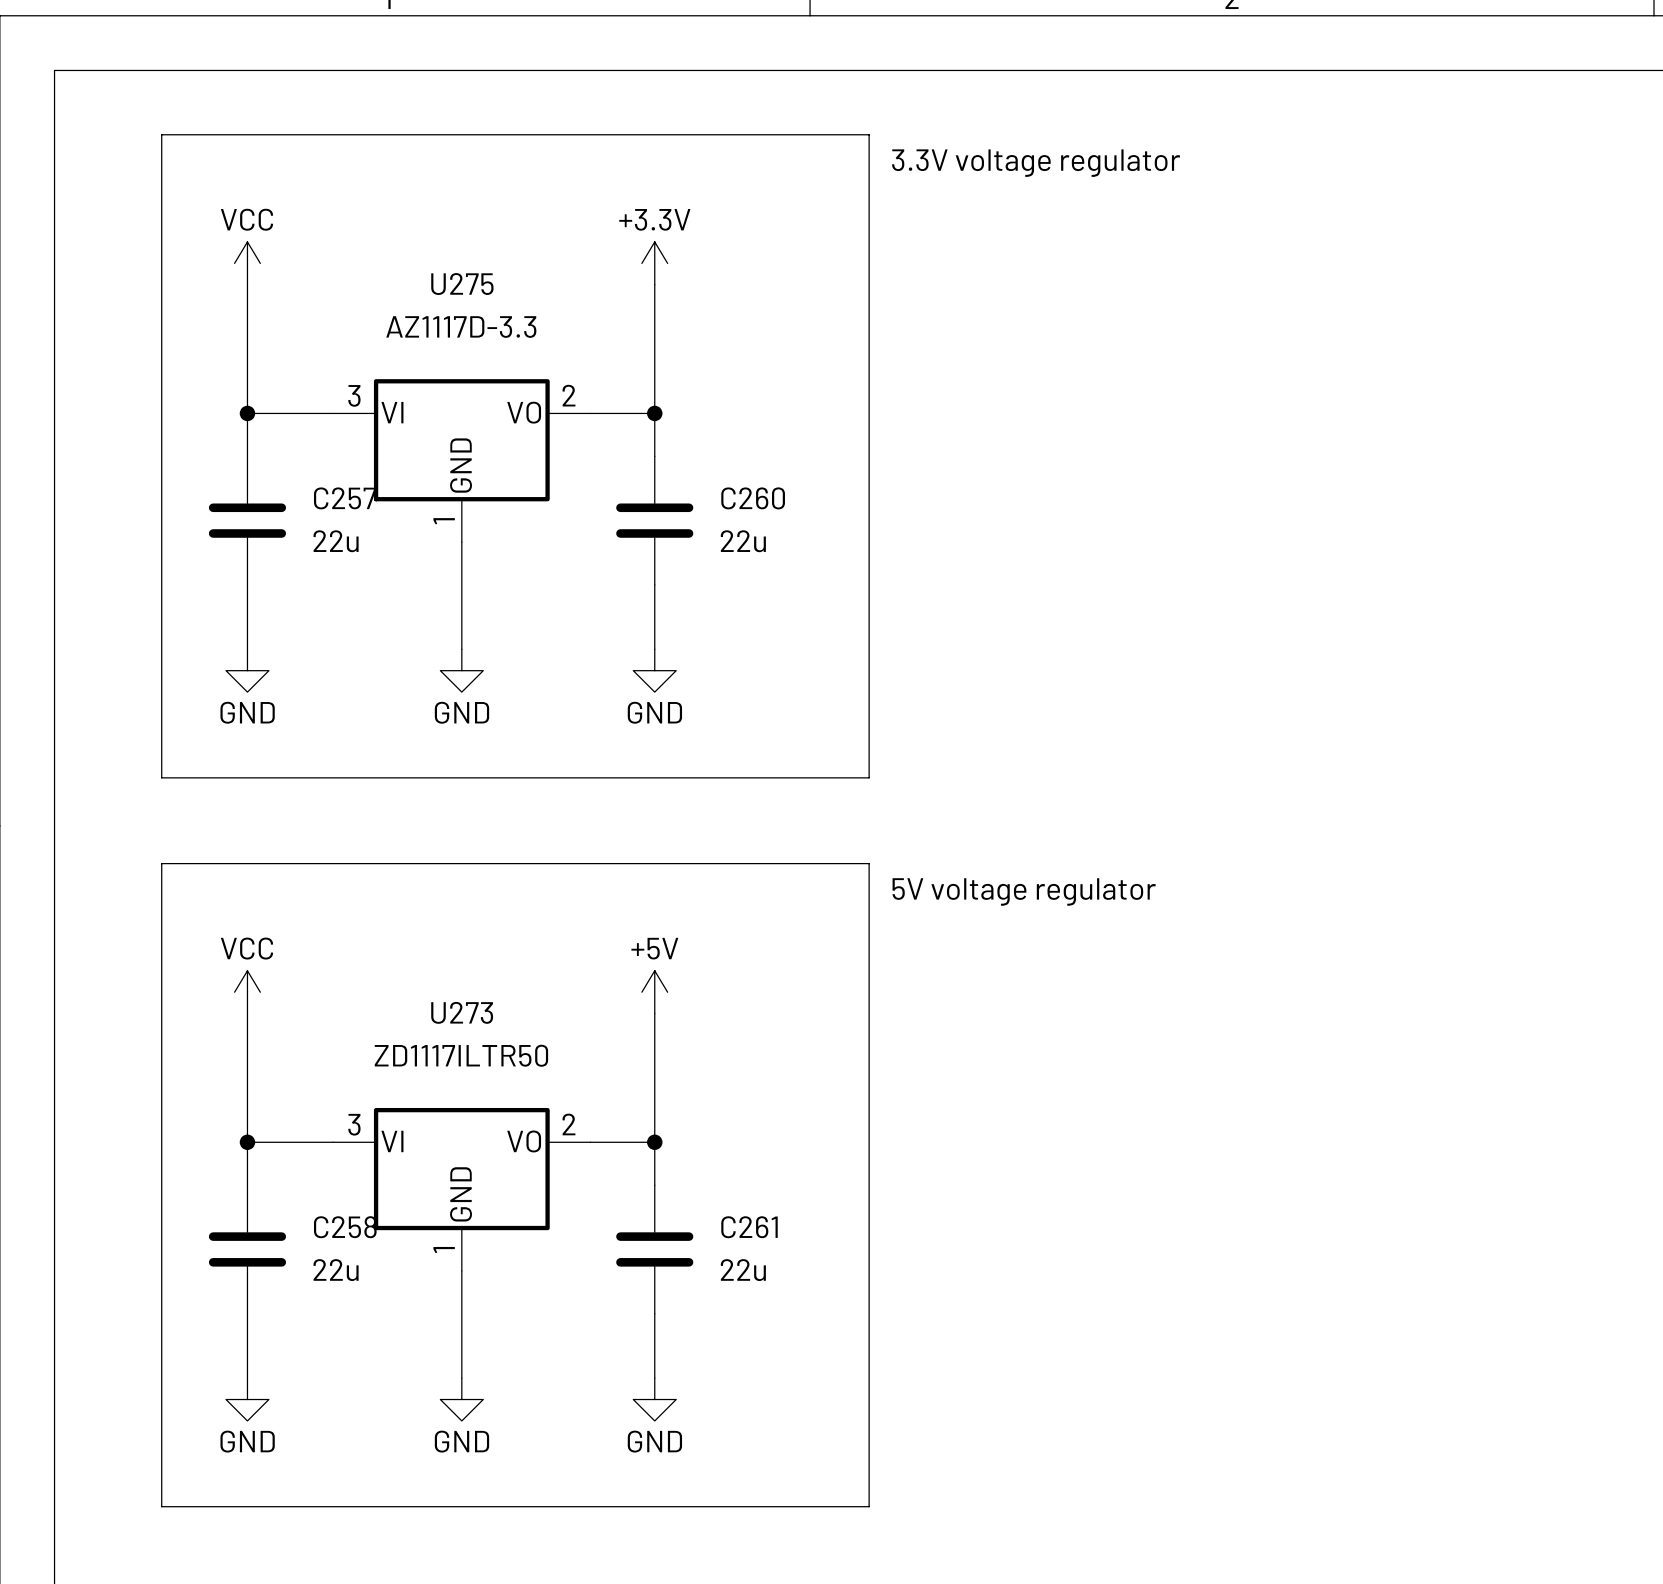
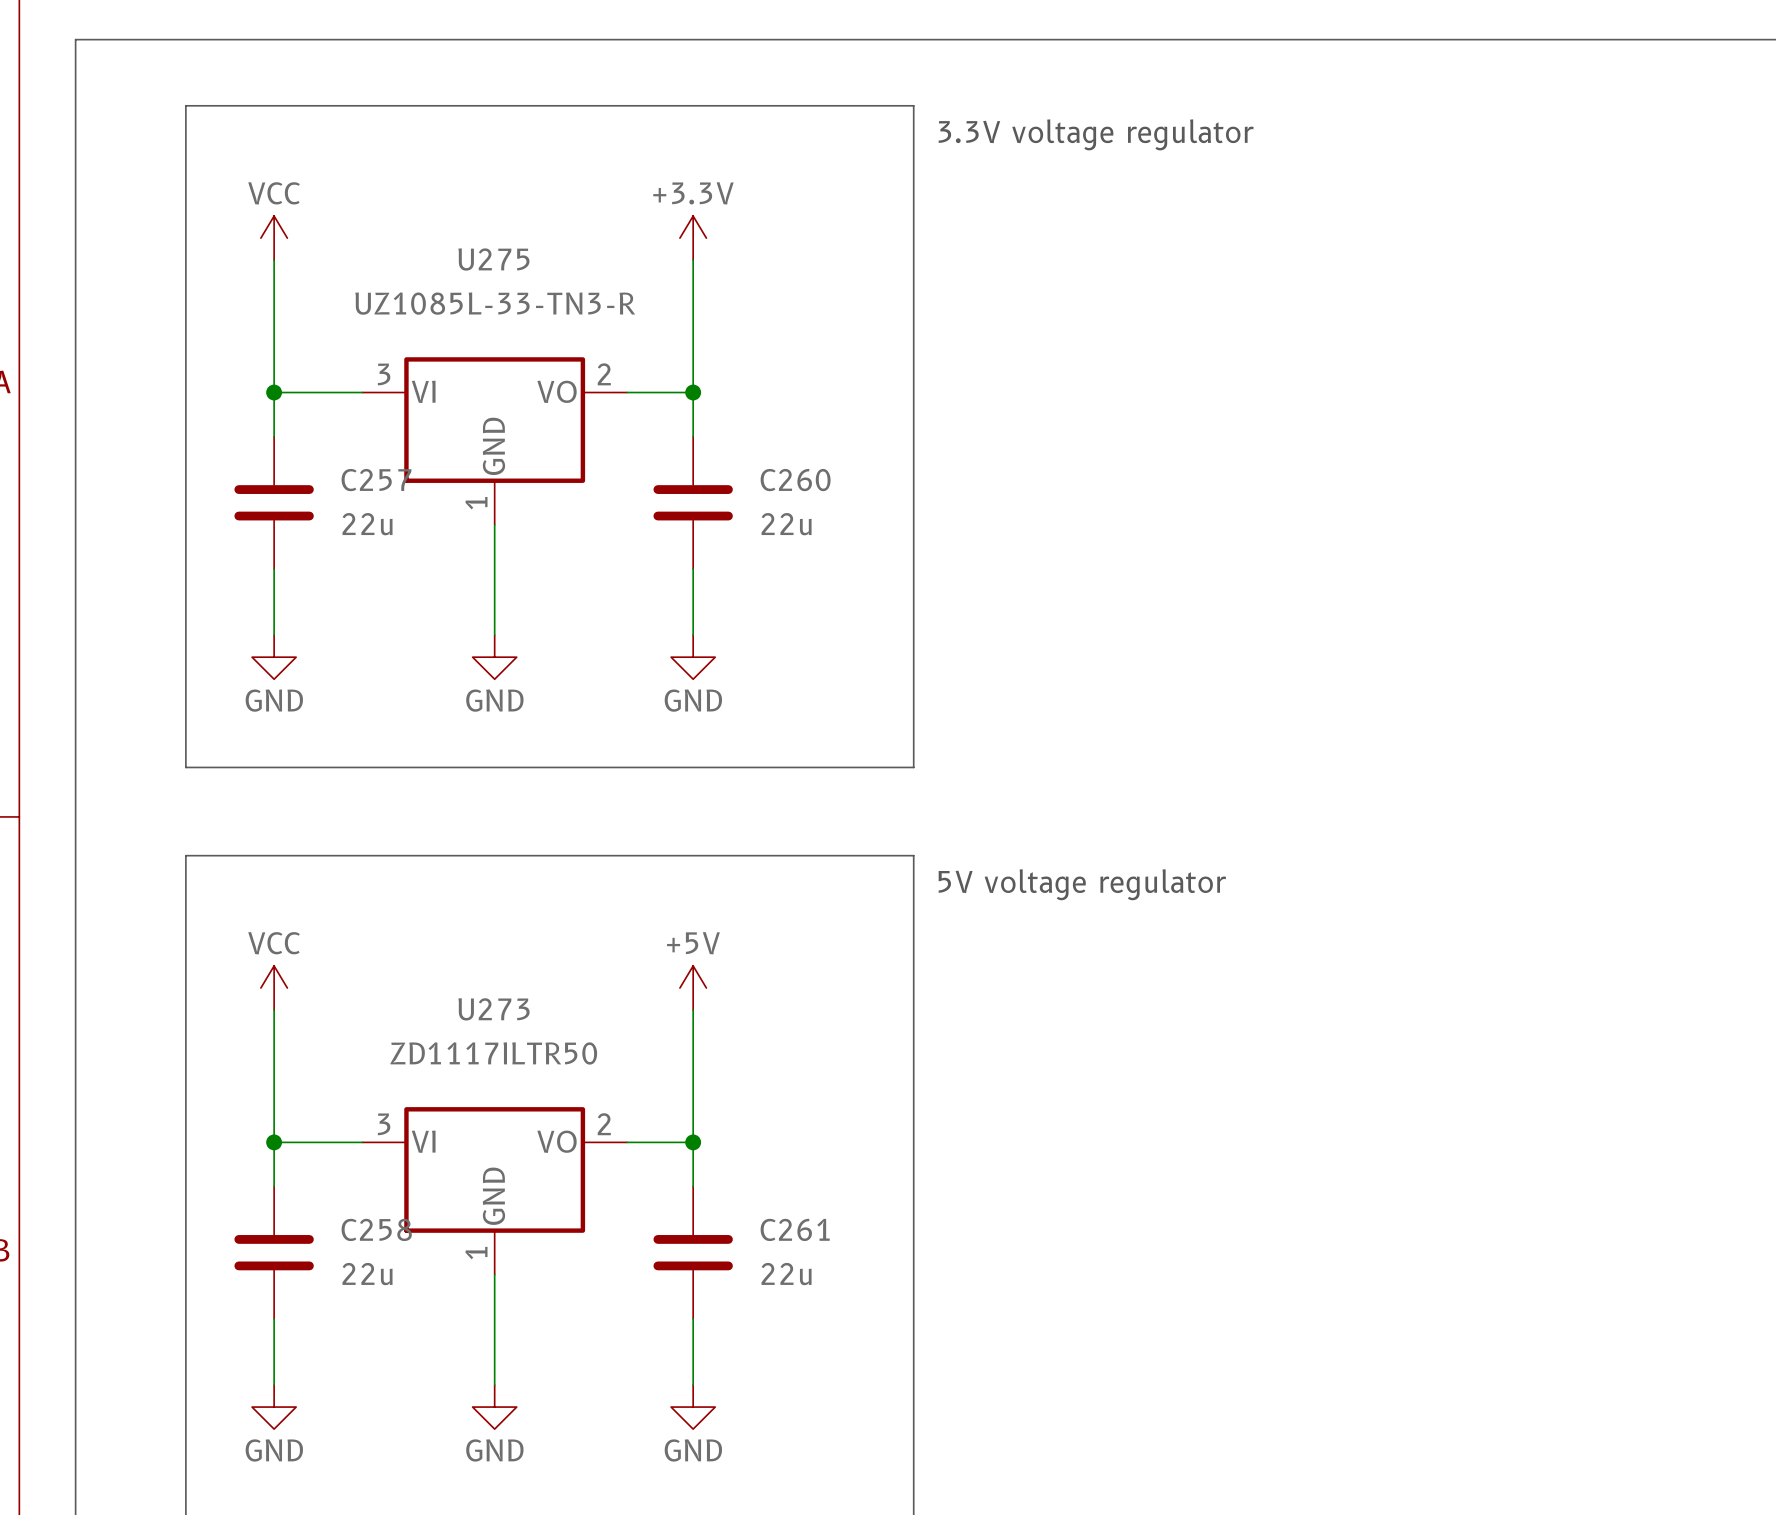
U275 value: AZ1117D-3.3 (461, 327) -> UZ1085L-33-TN3-R (495, 303)

